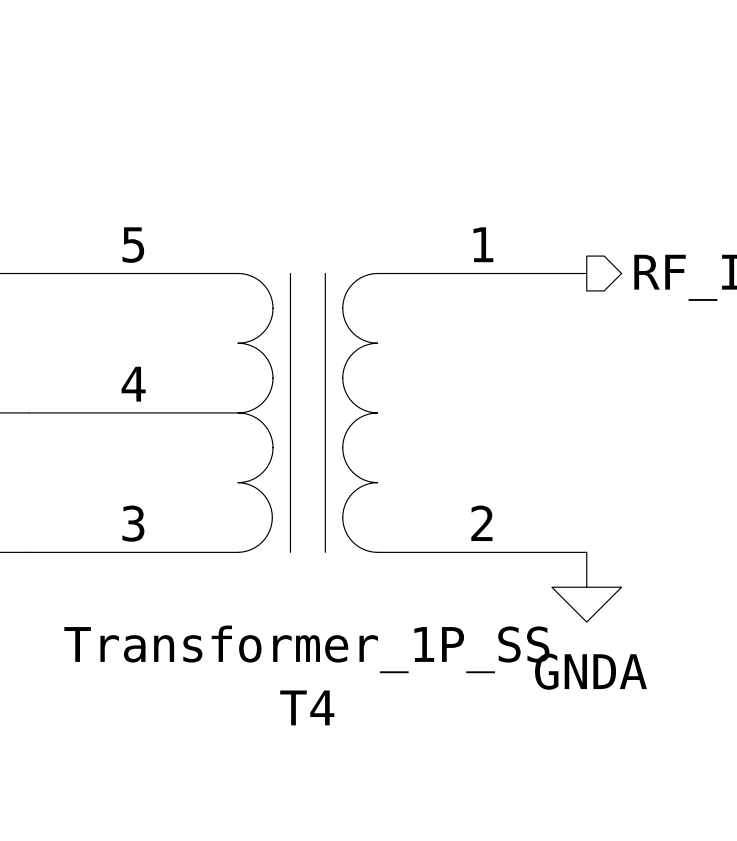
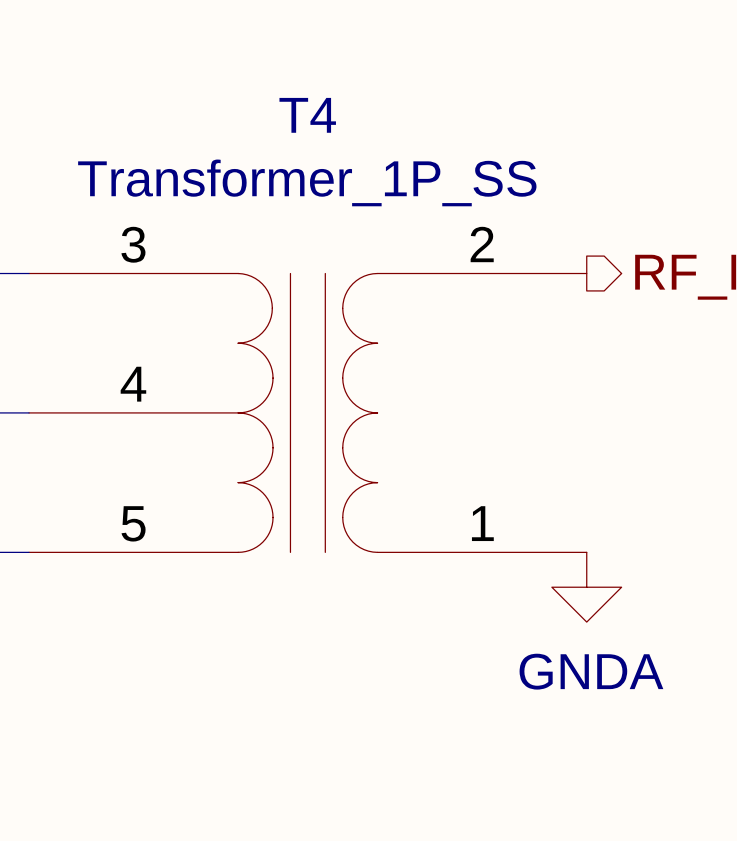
T4 flip: as is (307, 412) -> up-down (307, 412)

